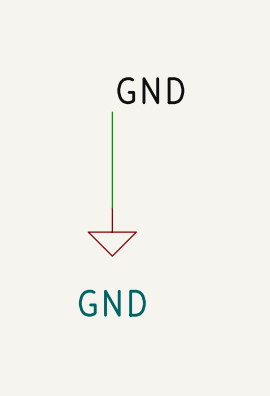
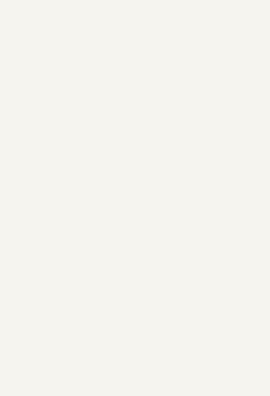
label: GND (150, 90) -> none
wire: (112, 112) (112, 208) -> none
power symbol: GND (112, 232) -> none

